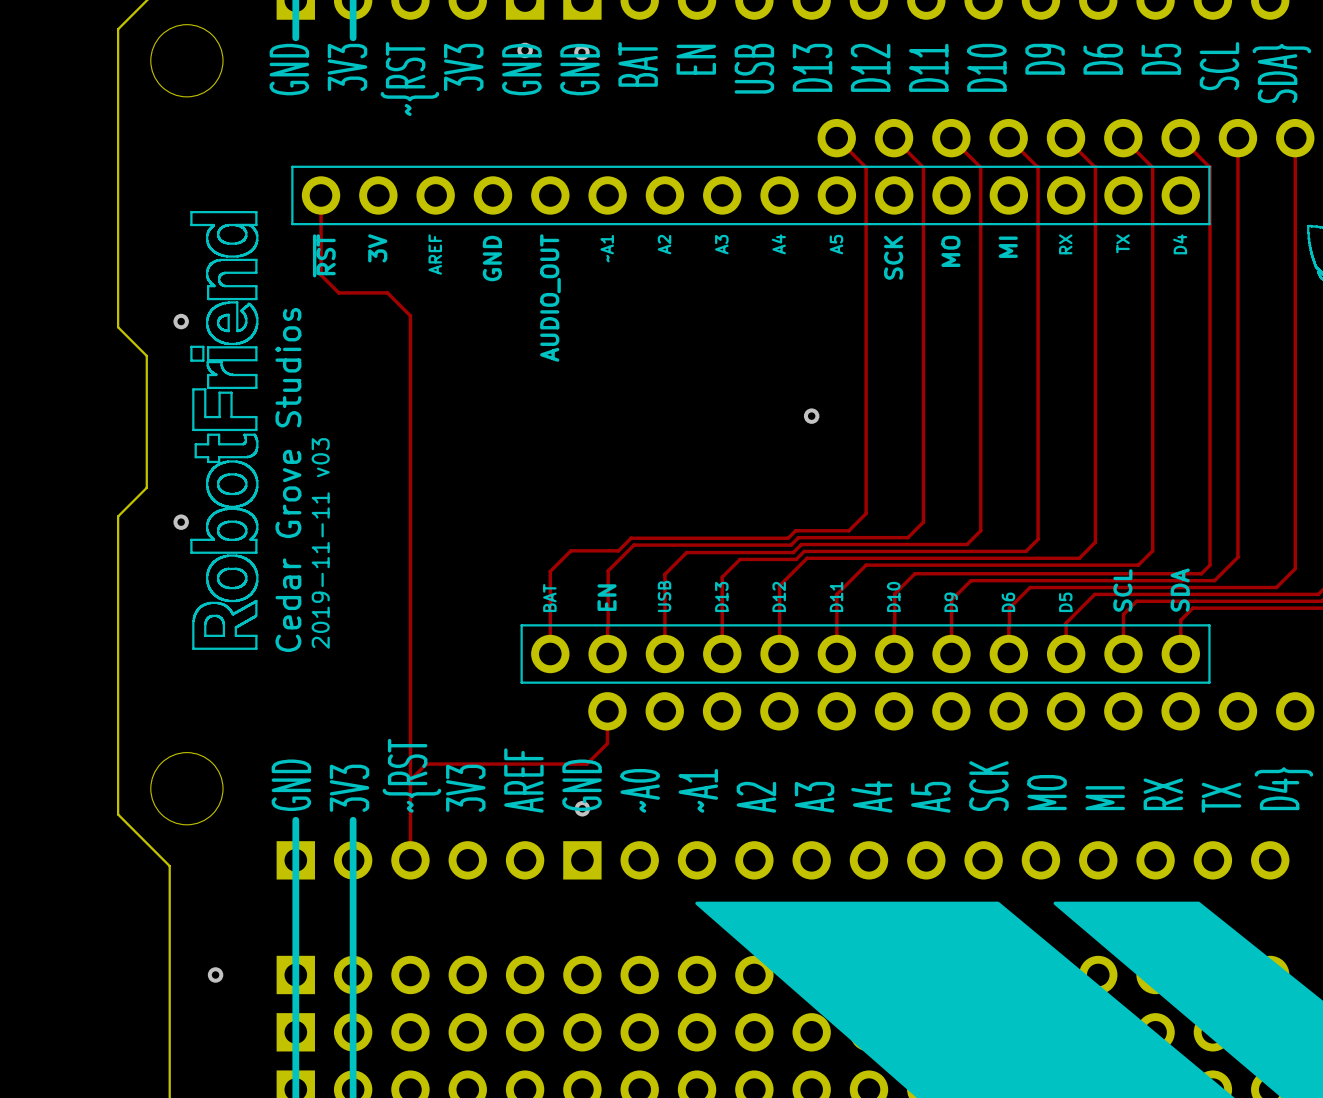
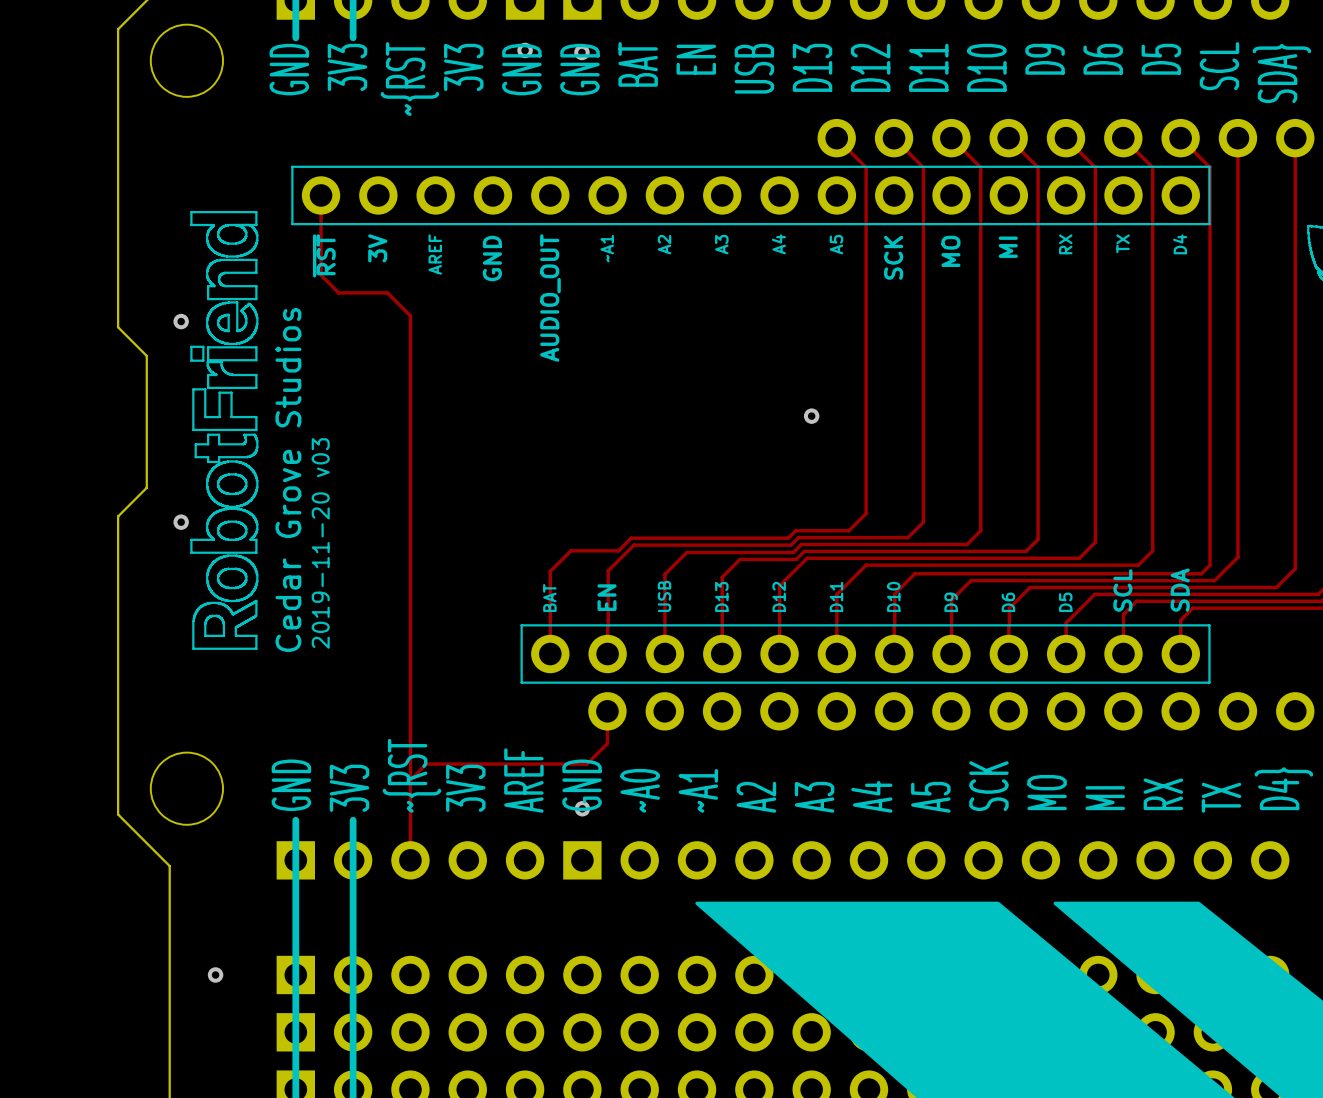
text: 2019-11-11 v03 (320, 543) -> 2019-11-20 v03 (320, 543)

